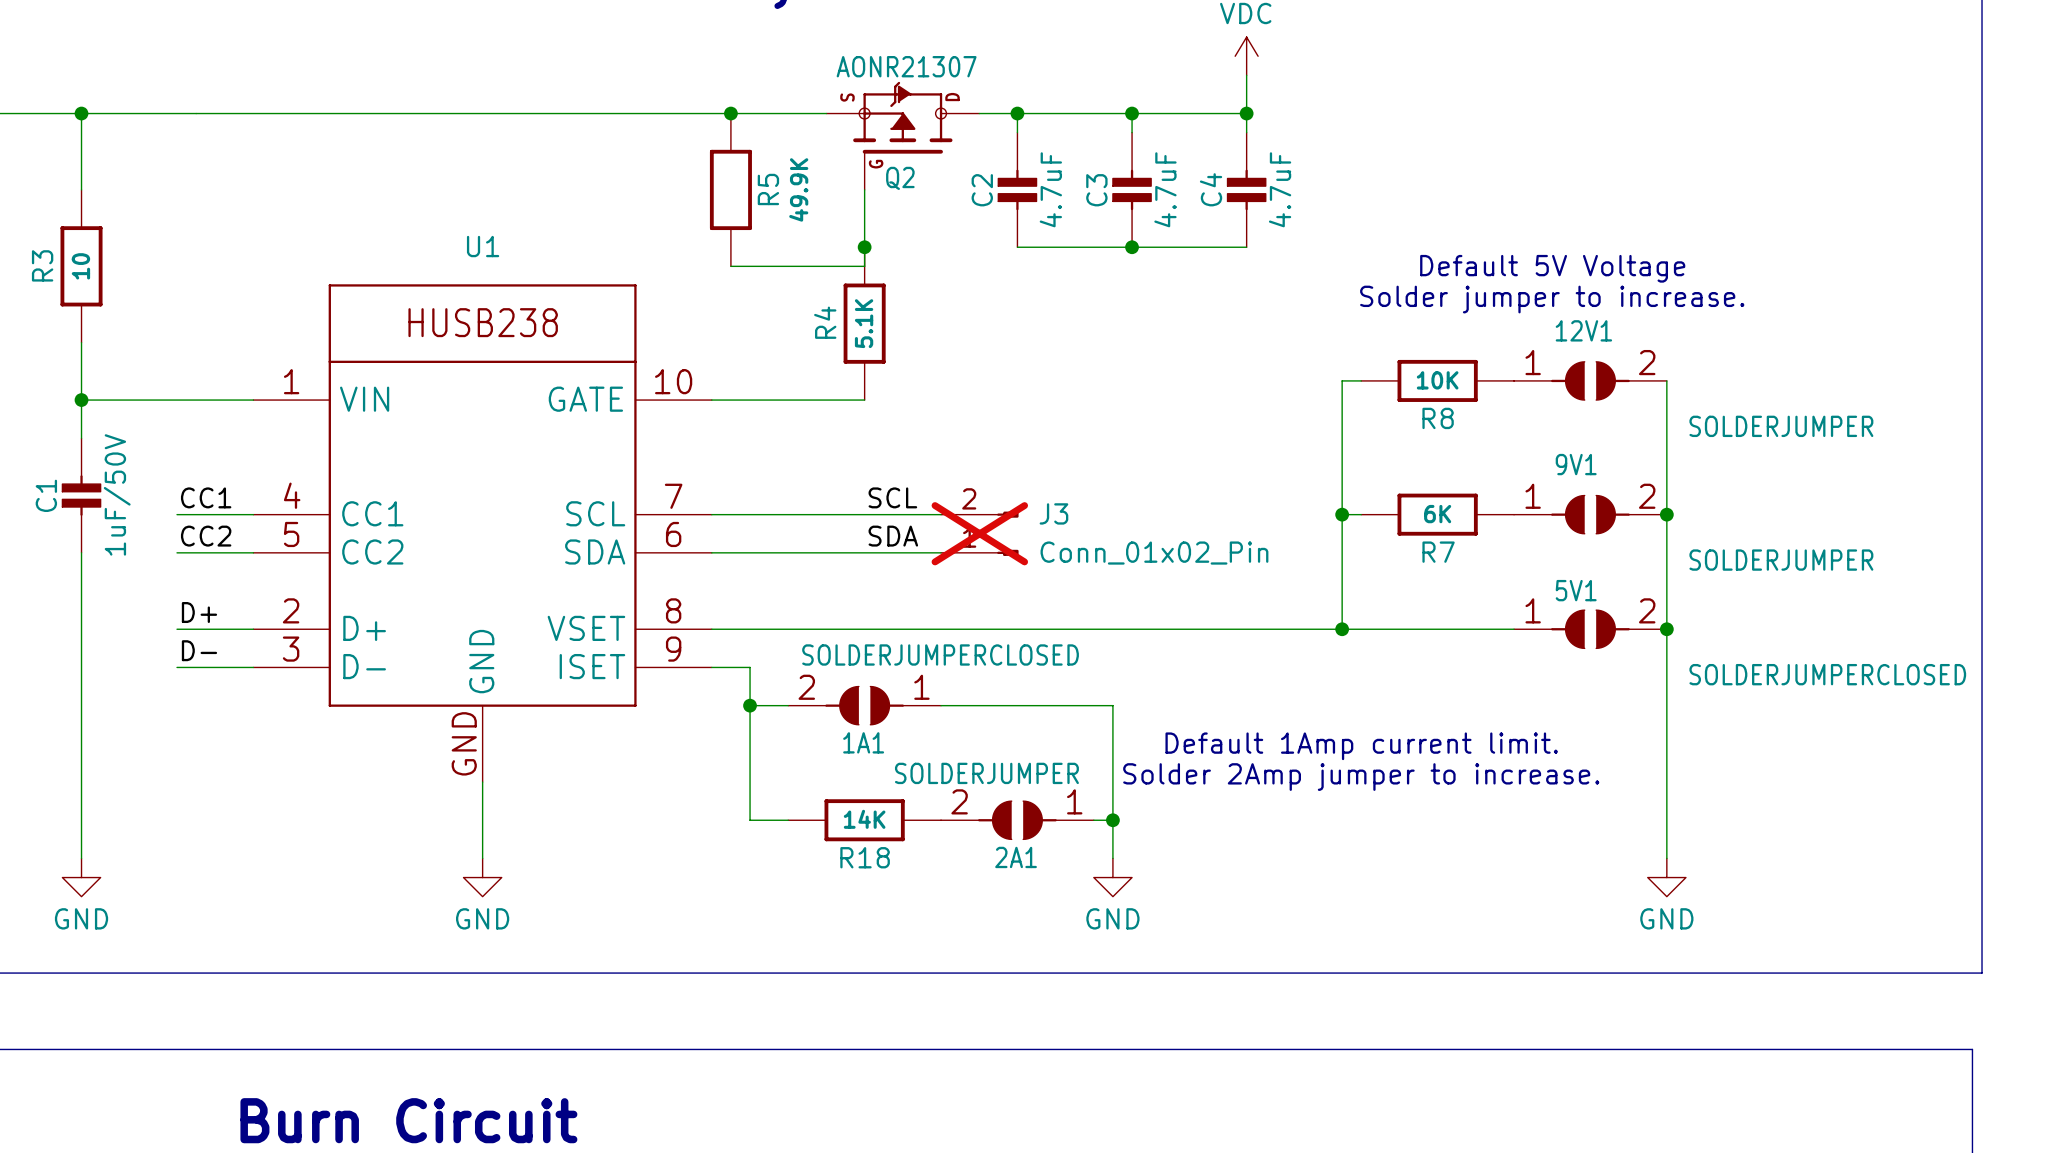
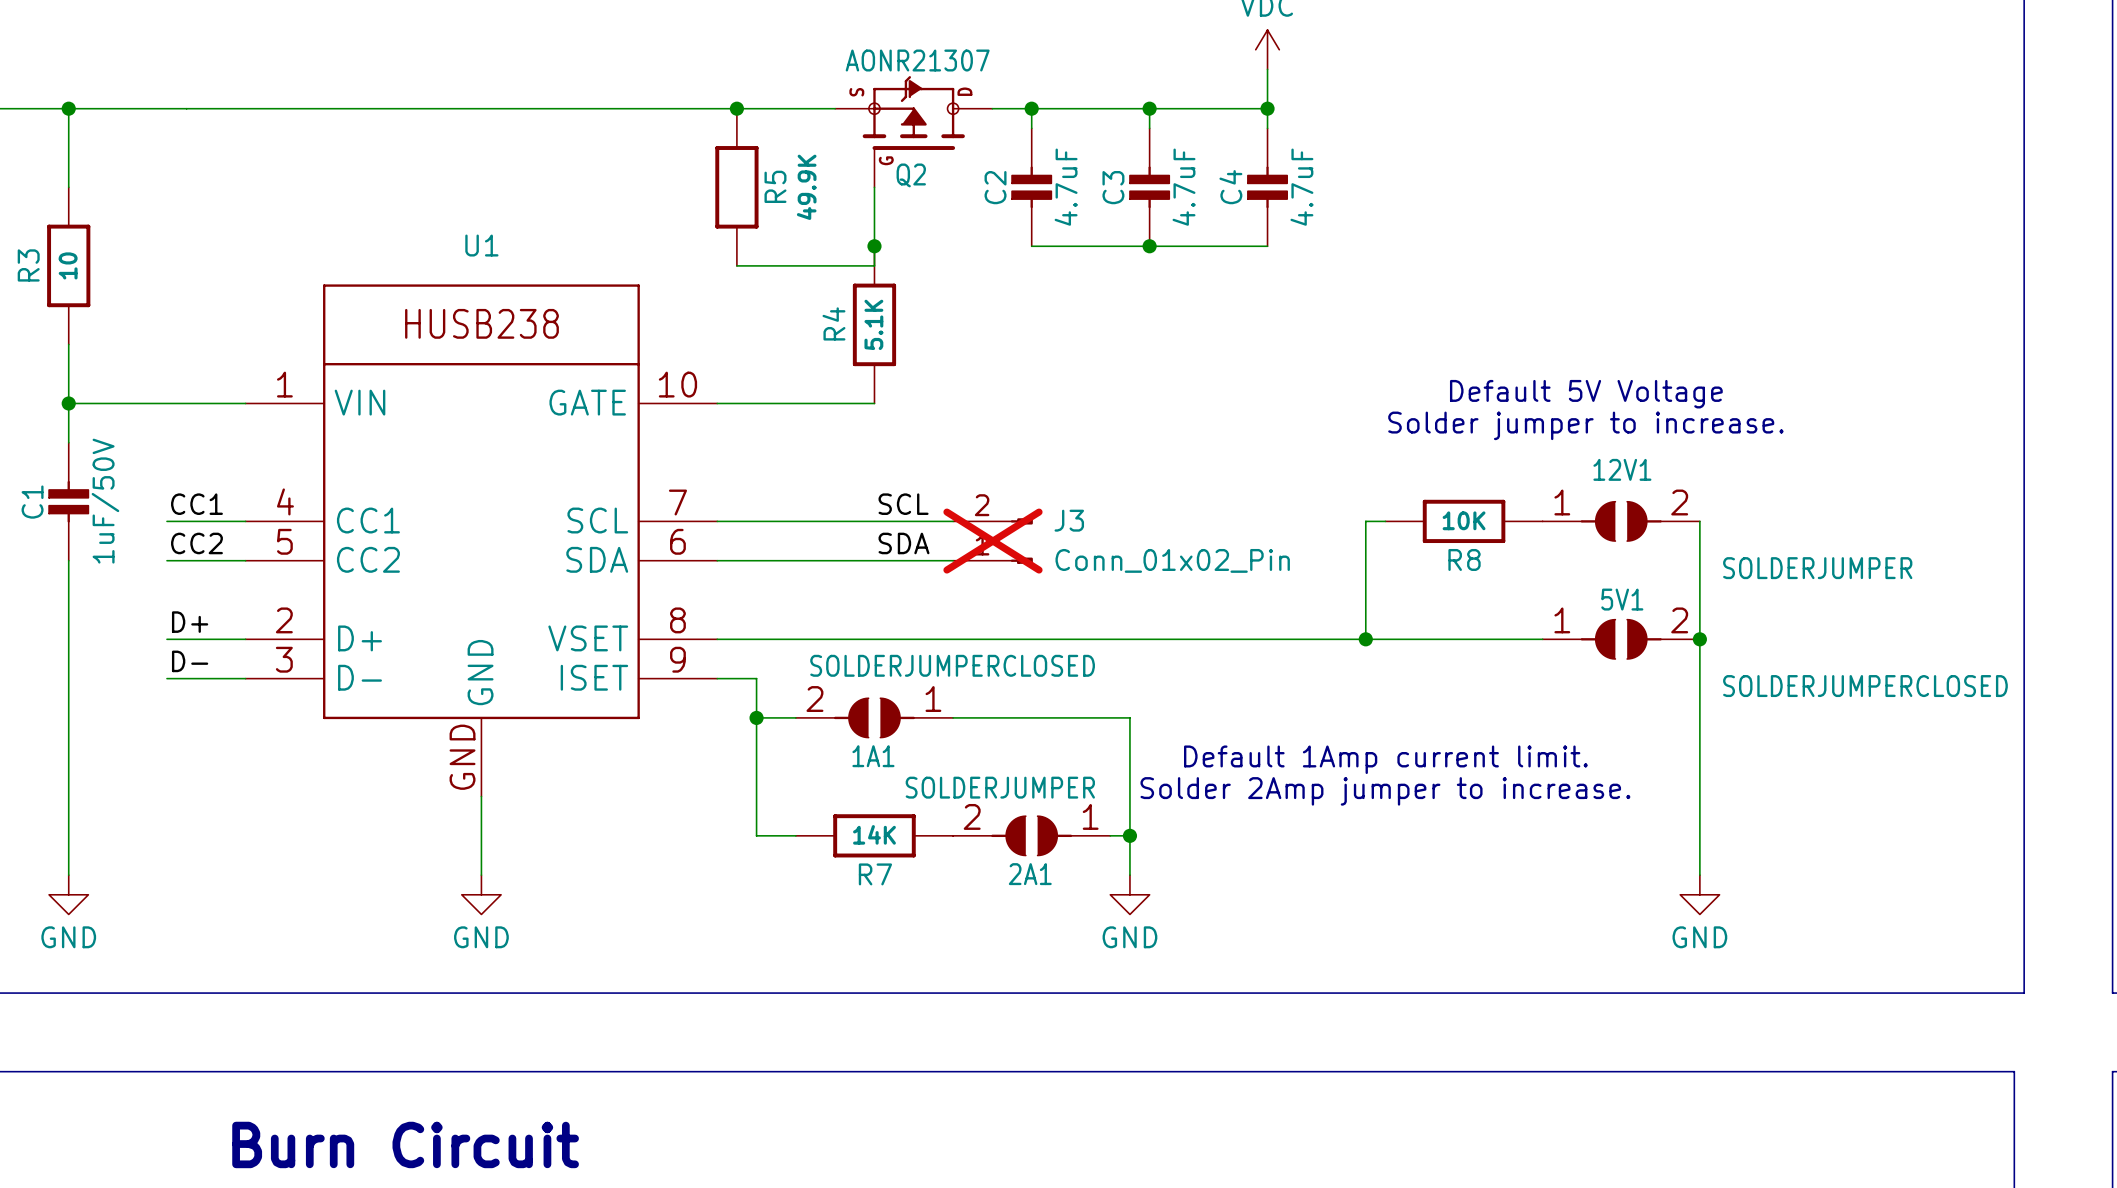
text position: Default 5V Voltage (1552, 268) -> Default 5V Voltage (1586, 394)
text position: Solder jumper to increase. (1552, 299) -> Solder jumper to increase. (1585, 425)
wire: (1361, 380) (1342, 380) (1342, 514) -> none
R8: 10K (1437, 380) -> none
12V1: SOLDERJUMPER (1590, 380) -> none
wire: (1666, 380) (1666, 514) -> none
9V1 name: 9V1 (1576, 464) -> 12V1 (1622, 469)
junction: (1342, 514) -> none
R7 value: 6K (1437, 514) -> 10K (1464, 520)
junction: (1666, 514) -> none
R7 name: R7 (1438, 552) -> R8 (1464, 559)
5V1 name position: 5V1 (1576, 590) -> 5V1 (1622, 599)
R18 name: R18 (865, 857) -> R7 (875, 874)

